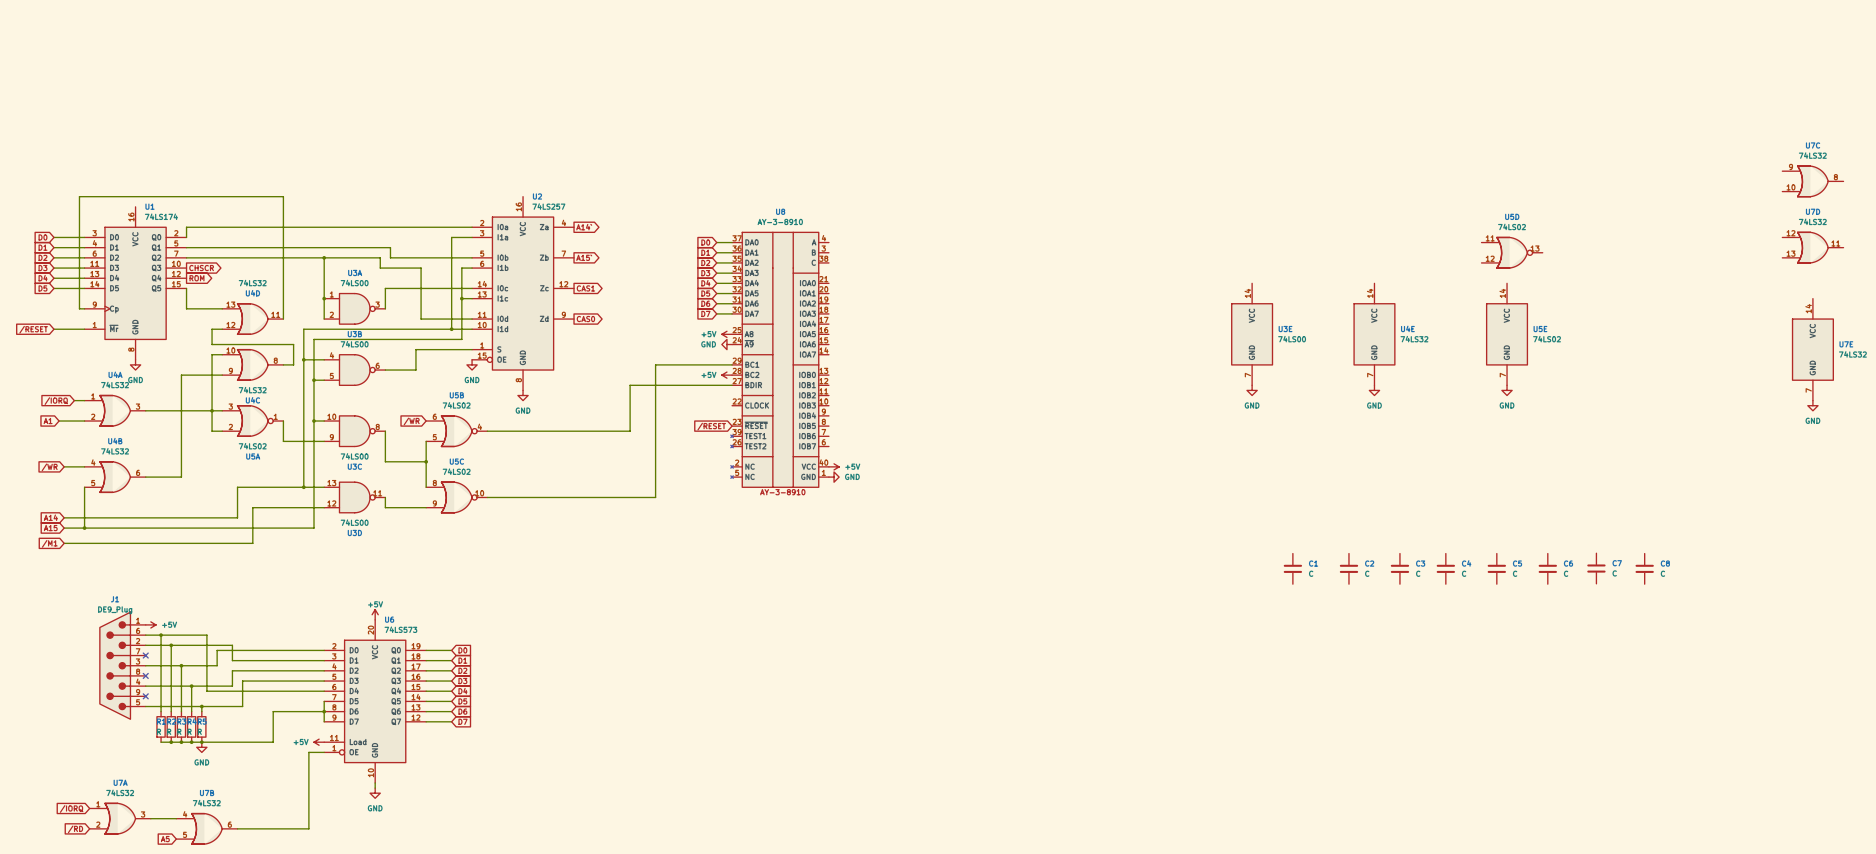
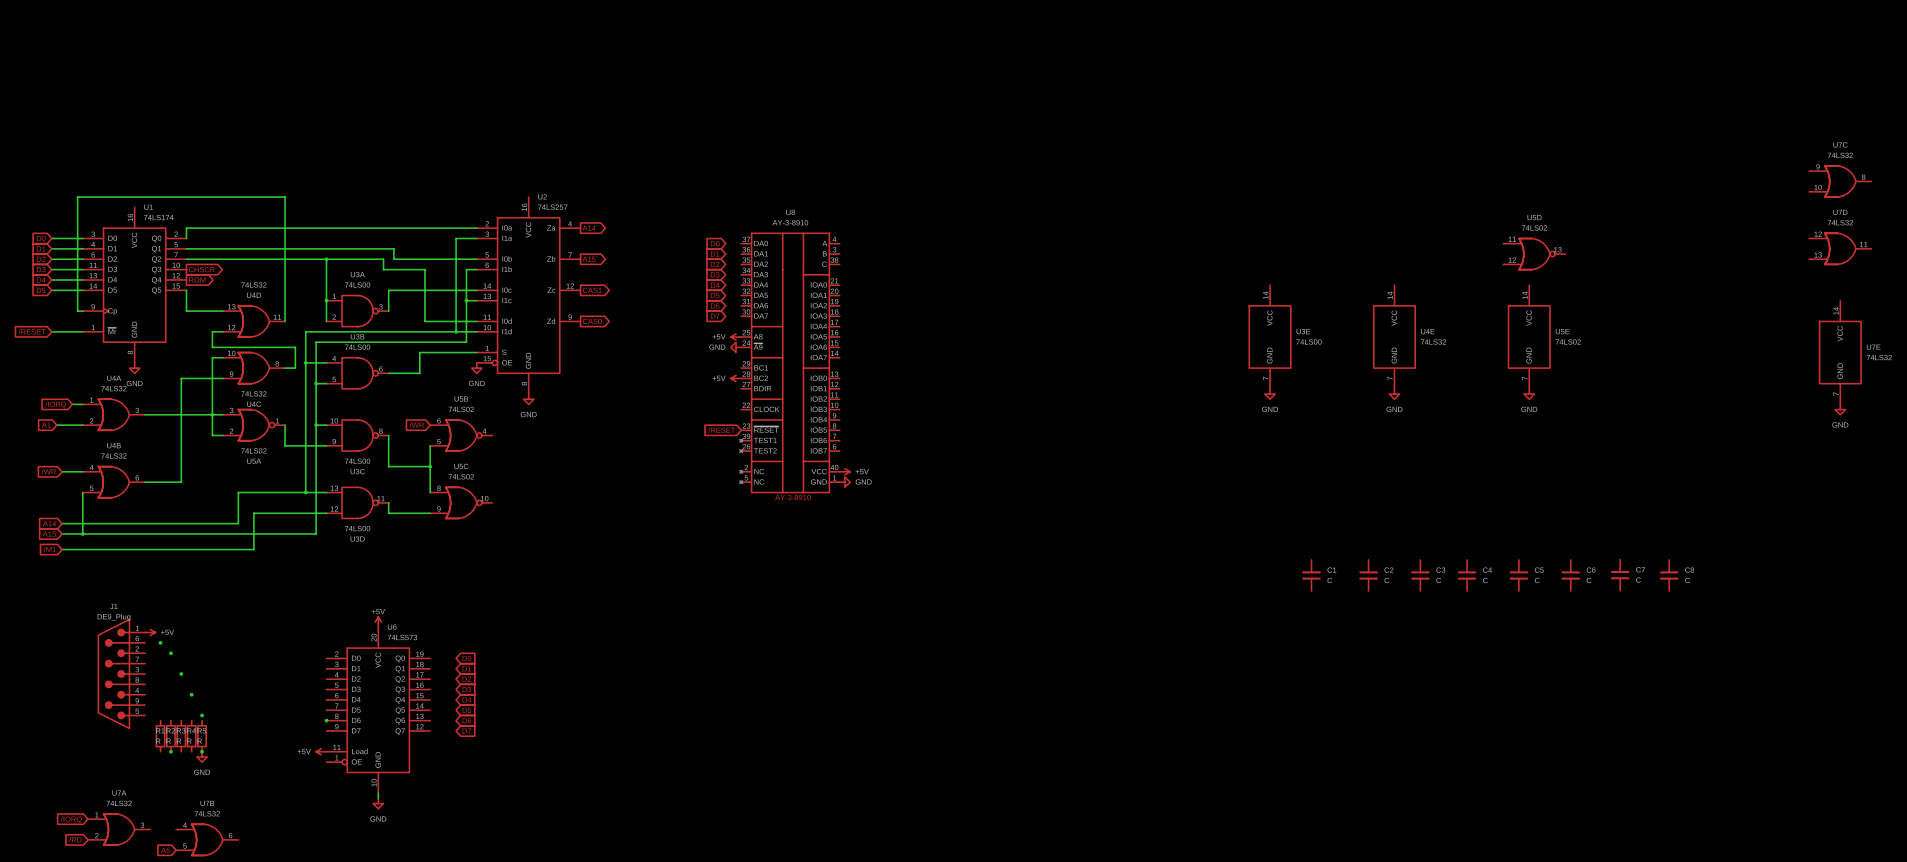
wire: (716, 242) (732, 242) -> none
wire: (716, 252) (732, 252) -> none
wire: (716, 262) (732, 262) -> none
wire: (716, 273) (732, 273) -> none
wire: (716, 283) (732, 283) -> none
wire: (716, 293) (732, 293) -> none
wire: (716, 303) (732, 303) -> none
wire: (716, 313) (732, 313) -> none
wire: (732, 364) (655, 364) (655, 497) (487, 497) -> none
wire: (732, 385) (630, 385) (630, 431) (487, 431) -> none
wire: (145, 635) (206, 635) (206, 691) (324, 691) -> none
wire: (161, 635) (161, 711) -> none
wire: (145, 645) (232, 645) (232, 660) (324, 660) -> none
wire: (171, 645) (171, 711) -> none
wire: (324, 650) (217, 650) (217, 665) (145, 665) -> none
wire: (426, 650) (451, 650) -> none
no-connect mark: (145, 655) -> none
wire: (426, 660) (451, 660) -> none
wire: (181, 665) (181, 711) -> none
wire: (324, 670) (232, 670) (232, 686) (145, 686) -> none
wire: (426, 670) (451, 670) -> none
no-connect mark: (145, 675) -> none
wire: (324, 681) (242, 681) (242, 706) (145, 706) -> none
wire: (426, 681) (451, 681) -> none
wire: (191, 686) (191, 711) -> none
wire: (426, 691) (451, 691) -> none
no-connect mark: (145, 696) -> none
wire: (324, 701) (324, 721) -> none
wire: (426, 701) (451, 701) -> none
wire: (201, 706) (201, 711) -> none
wire: (324, 711) (273, 711) (273, 742) (161, 742) -> none
wire: (426, 711) (451, 711) -> none
wire: (426, 721) (451, 721) -> none
junction: (181, 742) -> none
junction: (191, 742) -> none
wire: (324, 752) (308, 752) (308, 828) (237, 828) -> none
wire: (150, 818) (176, 818) -> none

